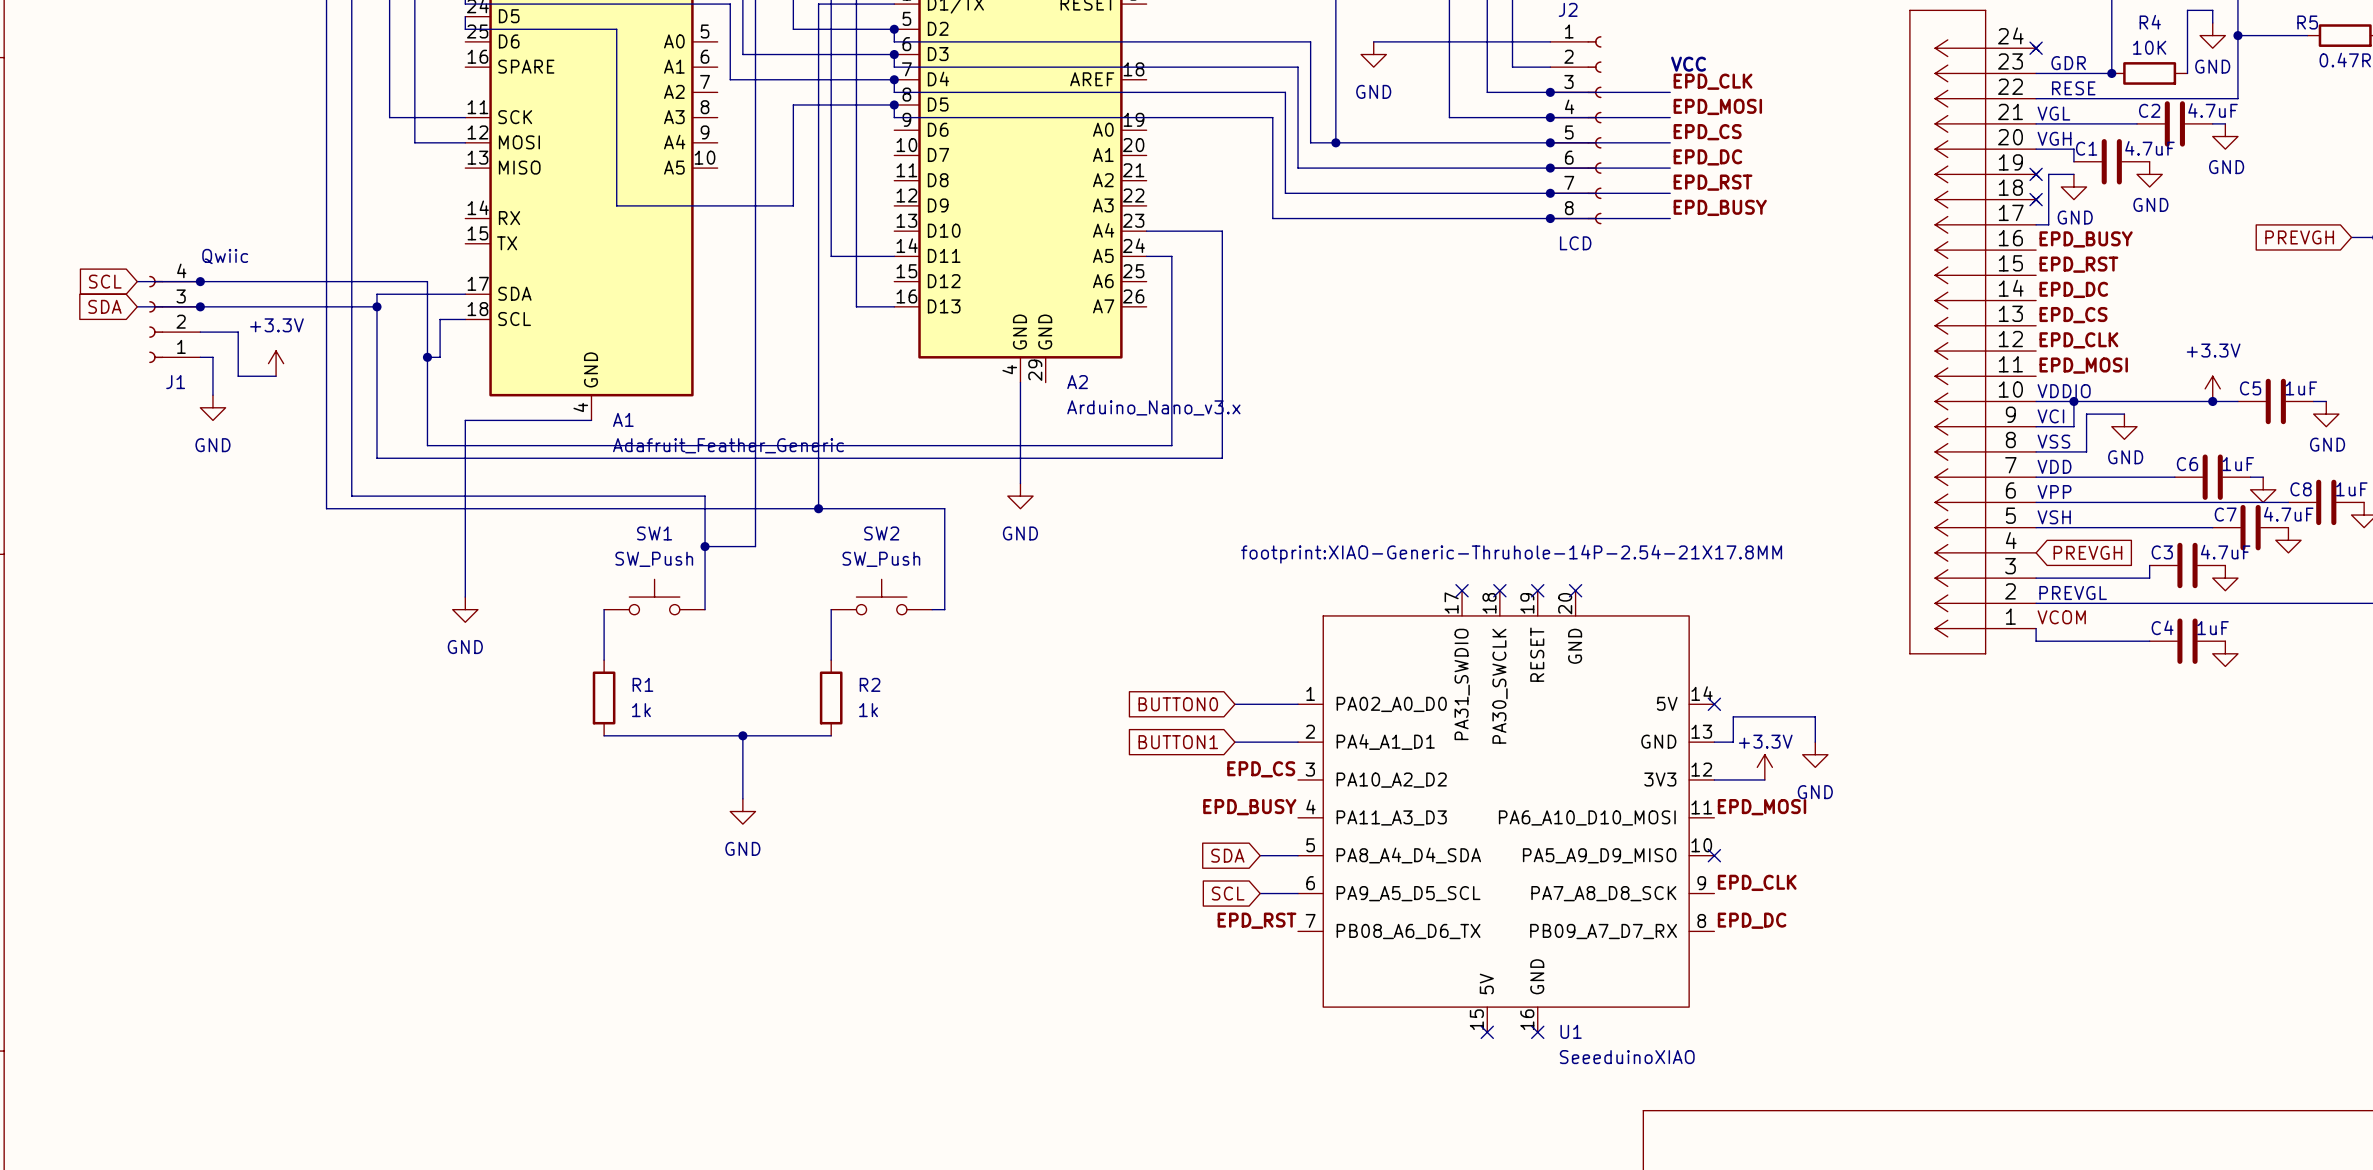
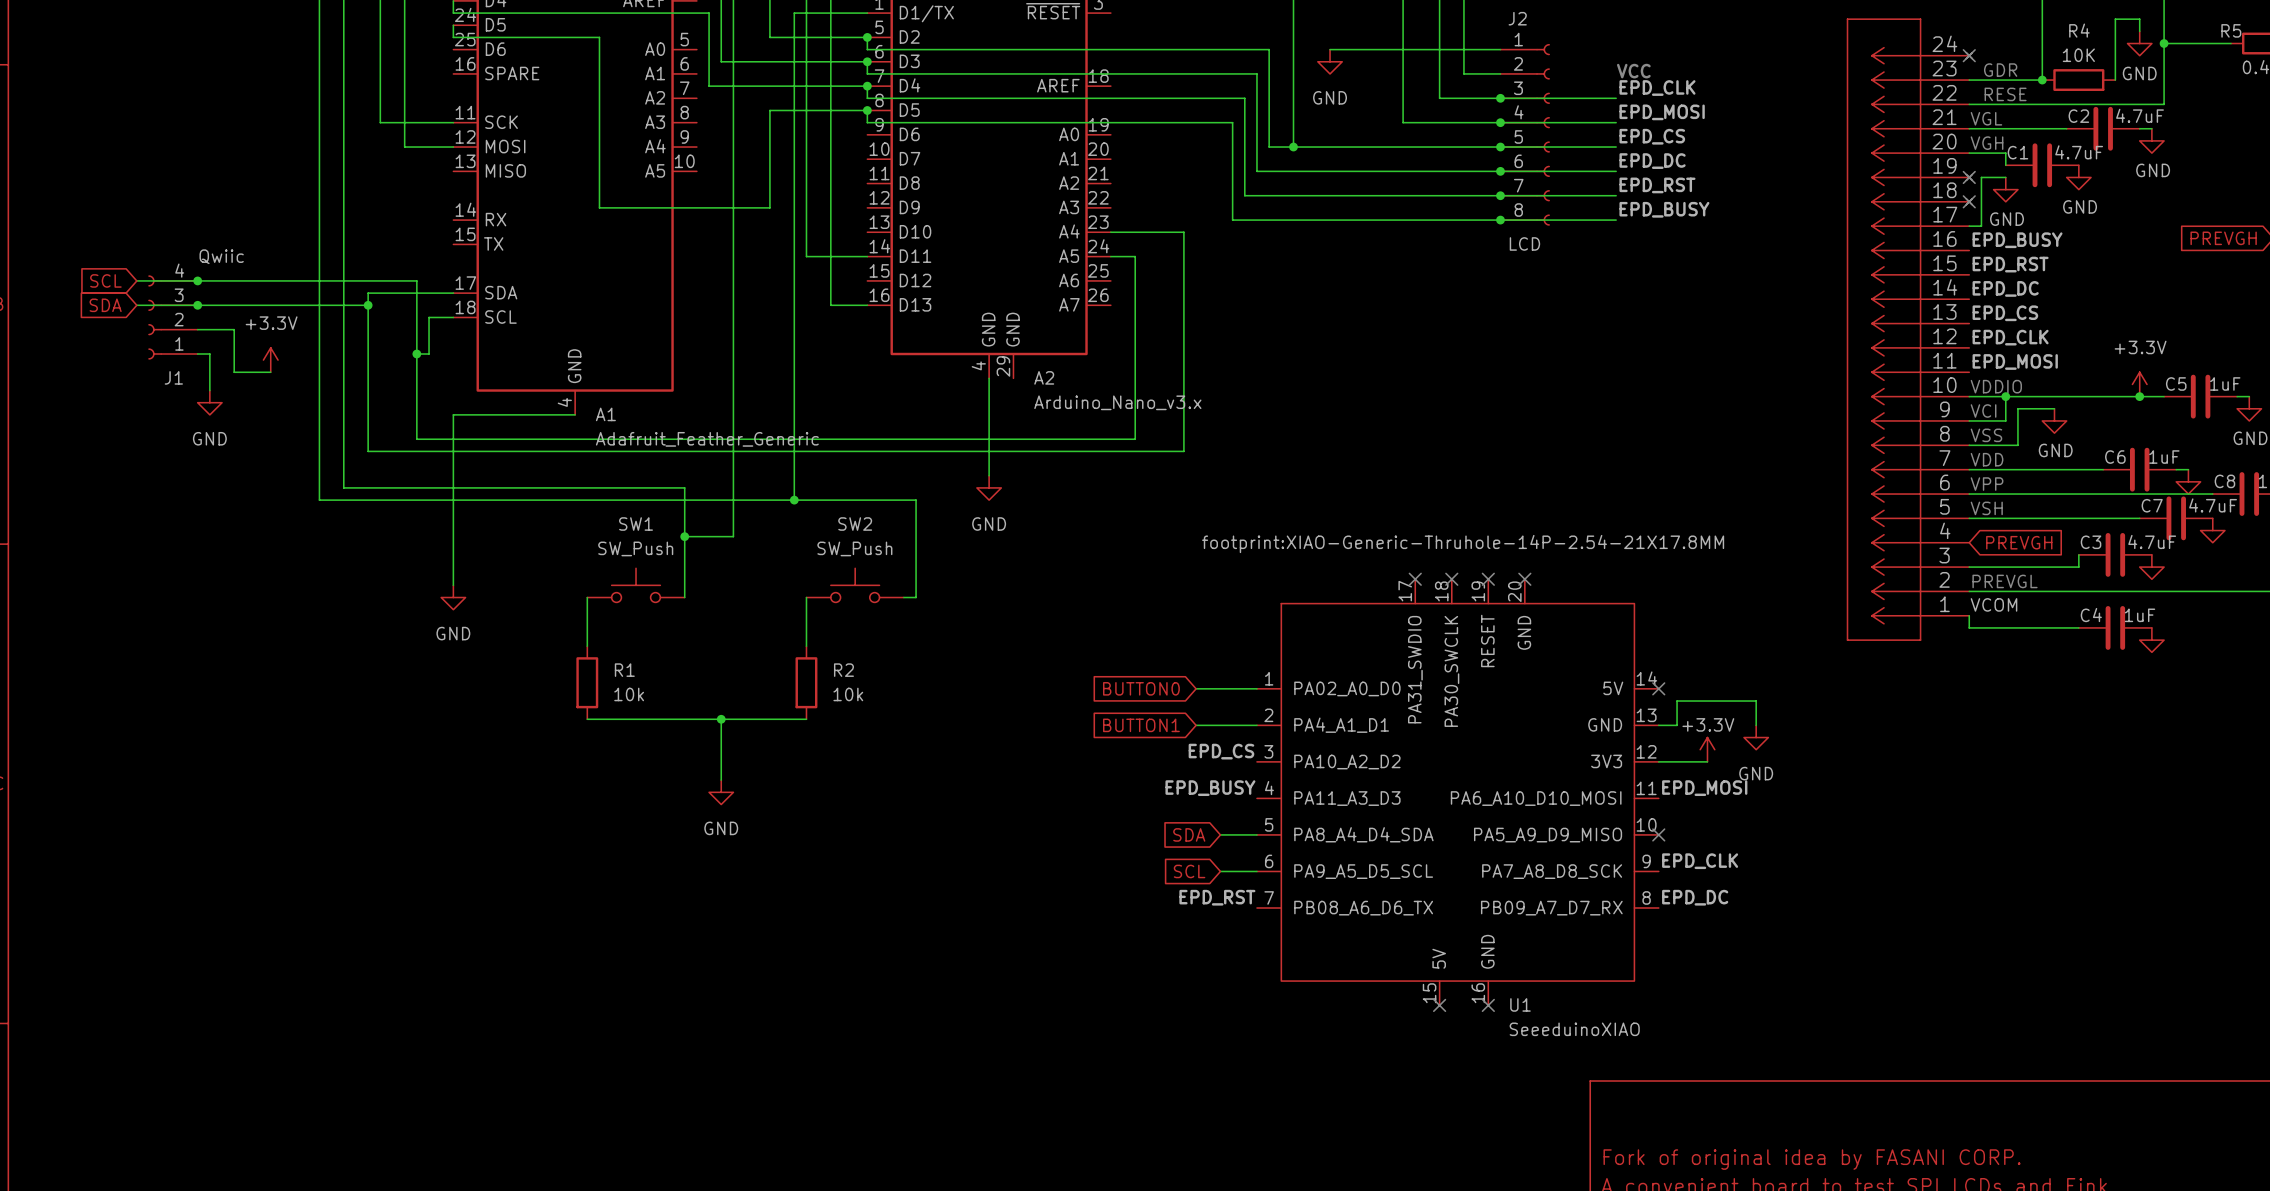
R1 value: 1k (641, 710) -> 10k (629, 694)
R2 value: 1k (868, 710) -> 10k (848, 694)

